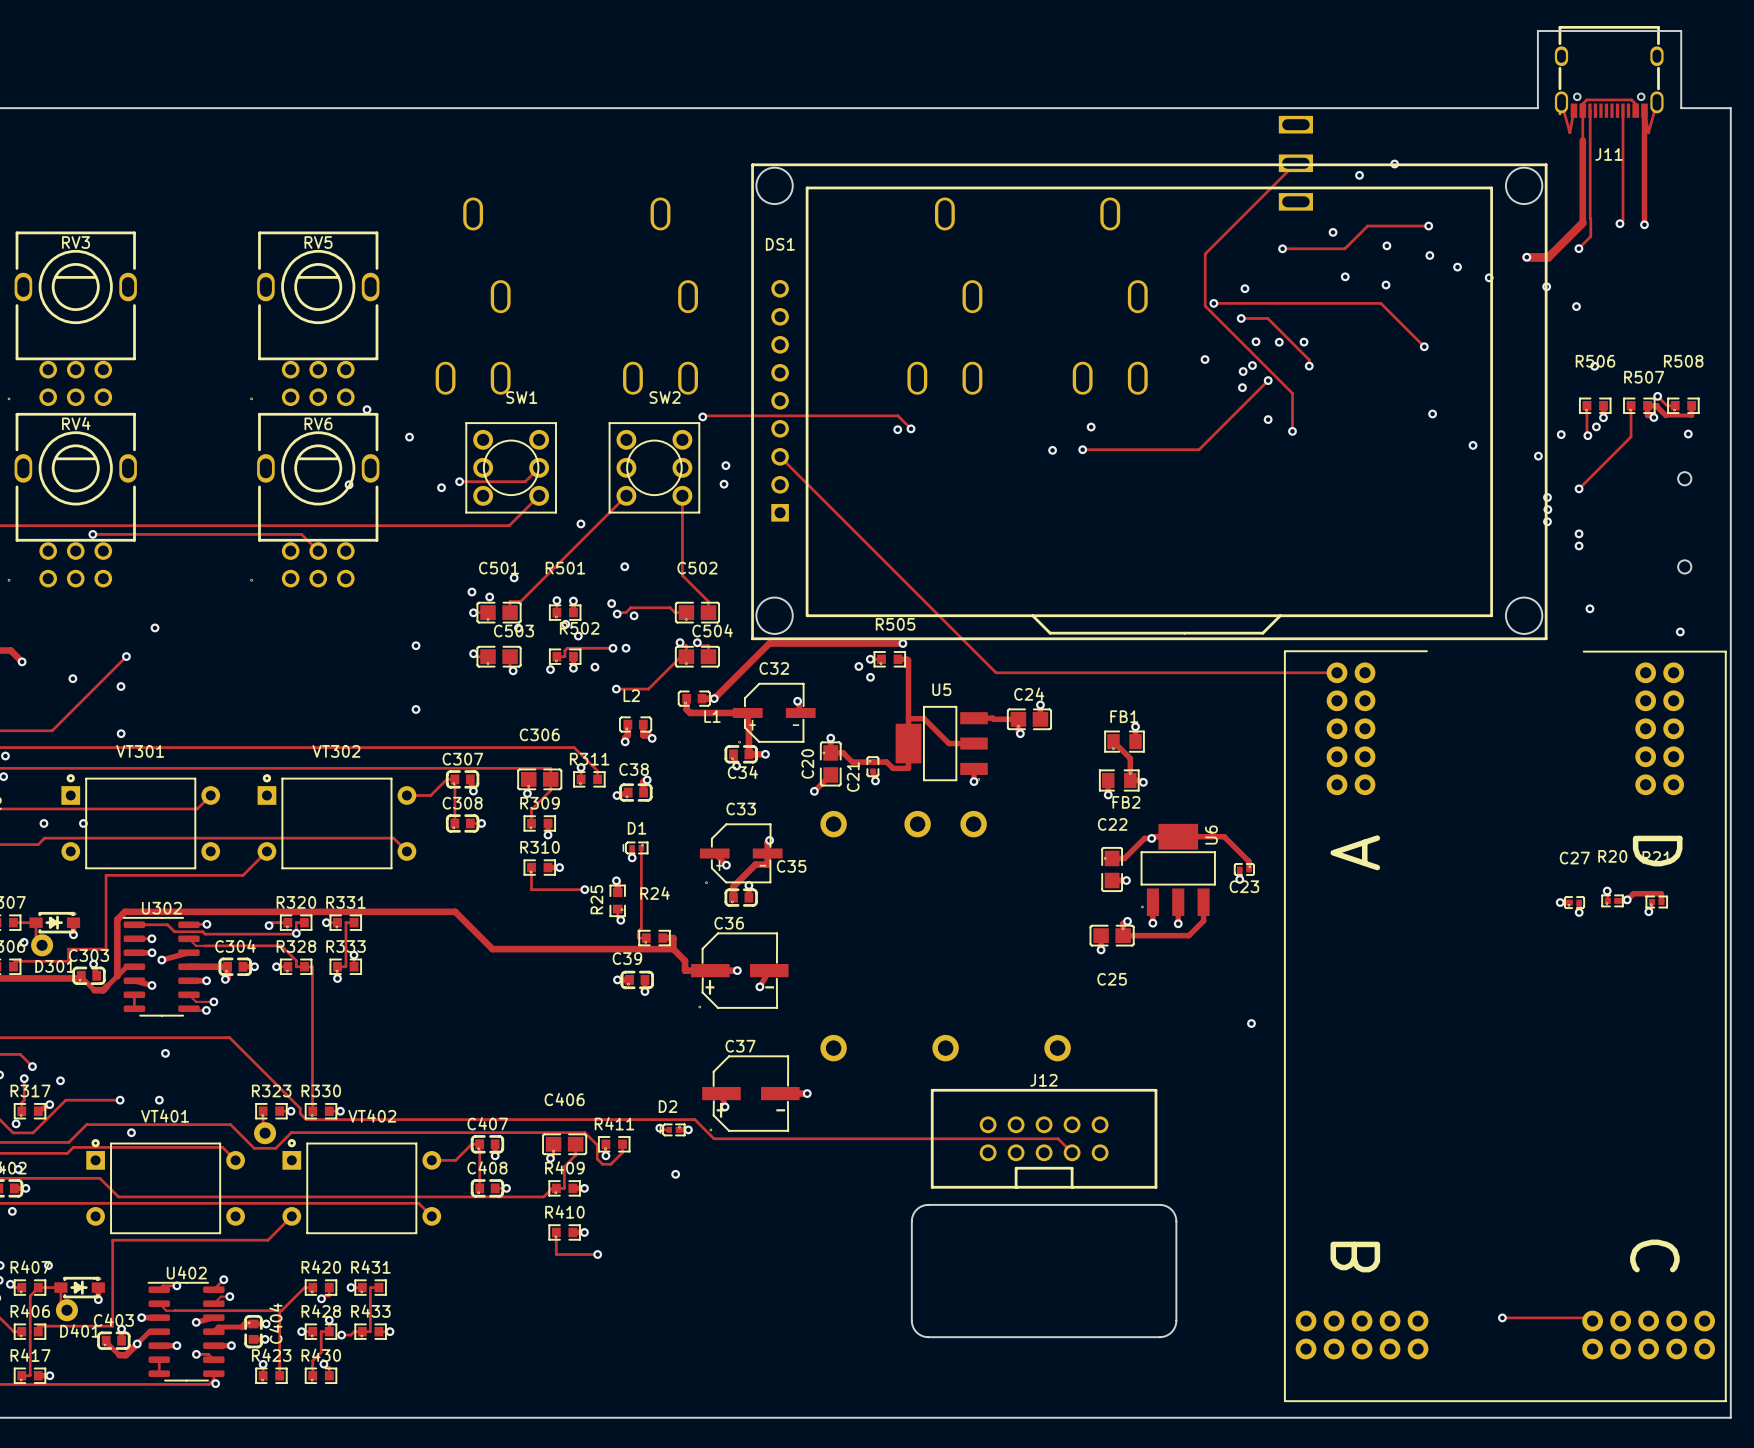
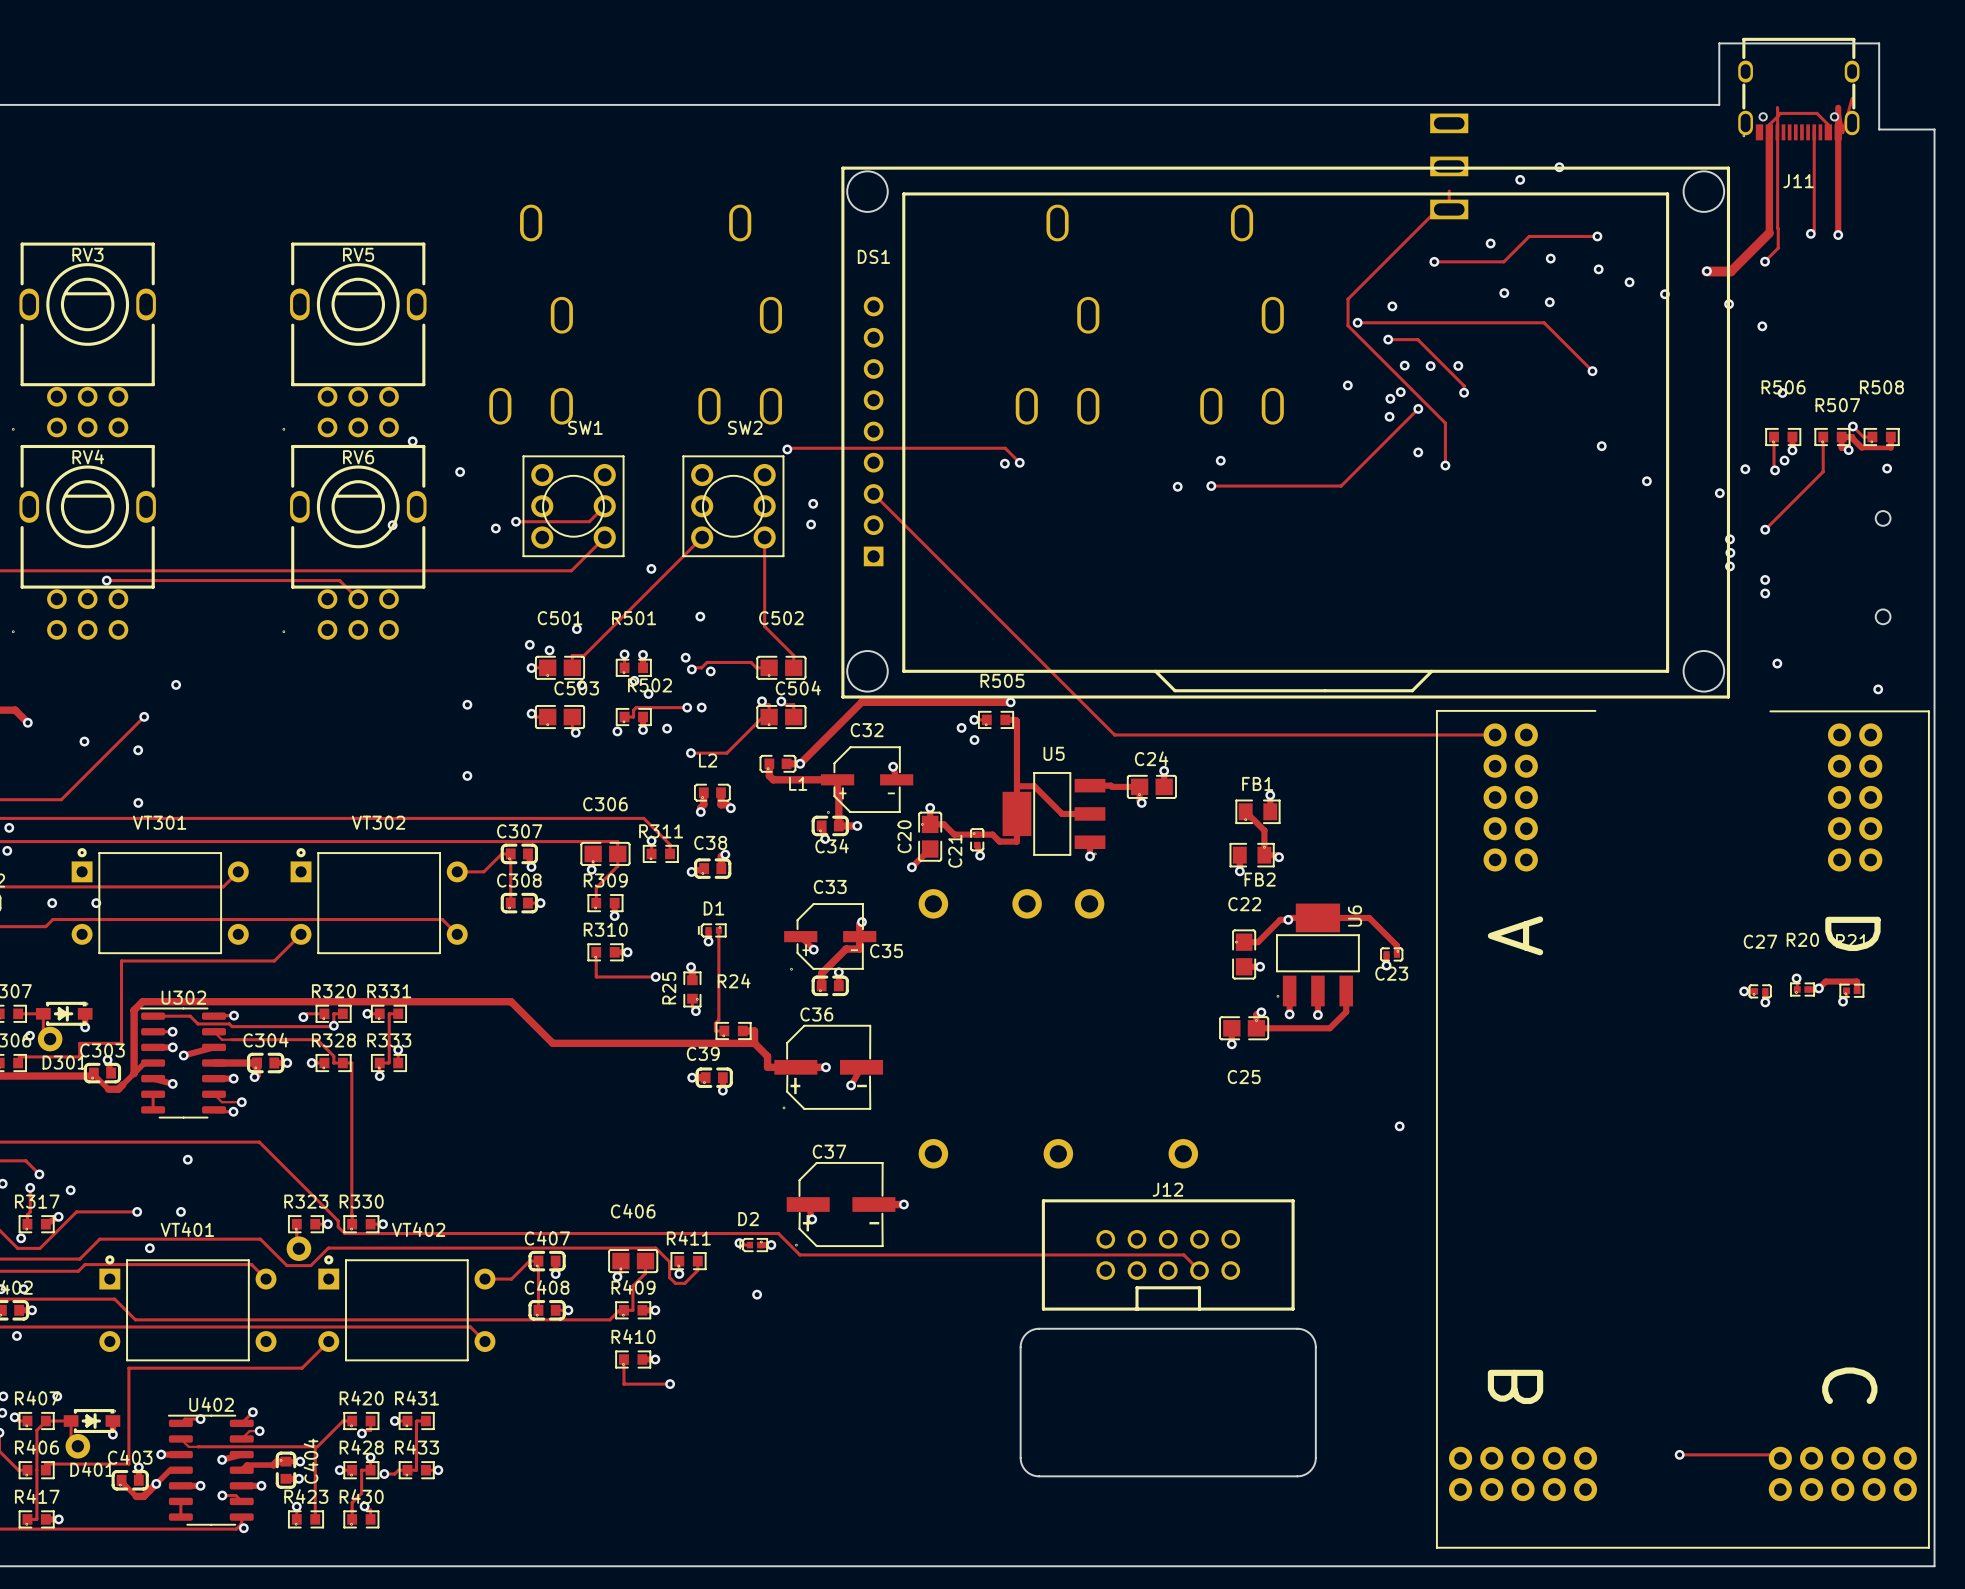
board edge: (1537, 53) (1537, 31) (1681, 31) (1681, 53) -> (1719, 43) (1879, 43)
J11 position: (1609, 71) -> (1798, 89)
track: (1561, 102) (1569, 132) (1573, 110) -> none
board edge: (1681, 108) (1730, 108) (1730, 130) -> (1879, 104) (1879, 129) (1934, 129)
track: (1623, 110) (1623, 132) -> none
track: (1635, 110) (1635, 103) (1631, 99) (1586, 99) (1582, 103) (1582, 126) -> (1828, 132) (1828, 124) (1816, 113) (1780, 113) (1769, 124)
track: (1295, 163) (1205, 253) (1205, 282) -> (1449, 191) (1449, 204) (1442, 204) (1348, 299)

